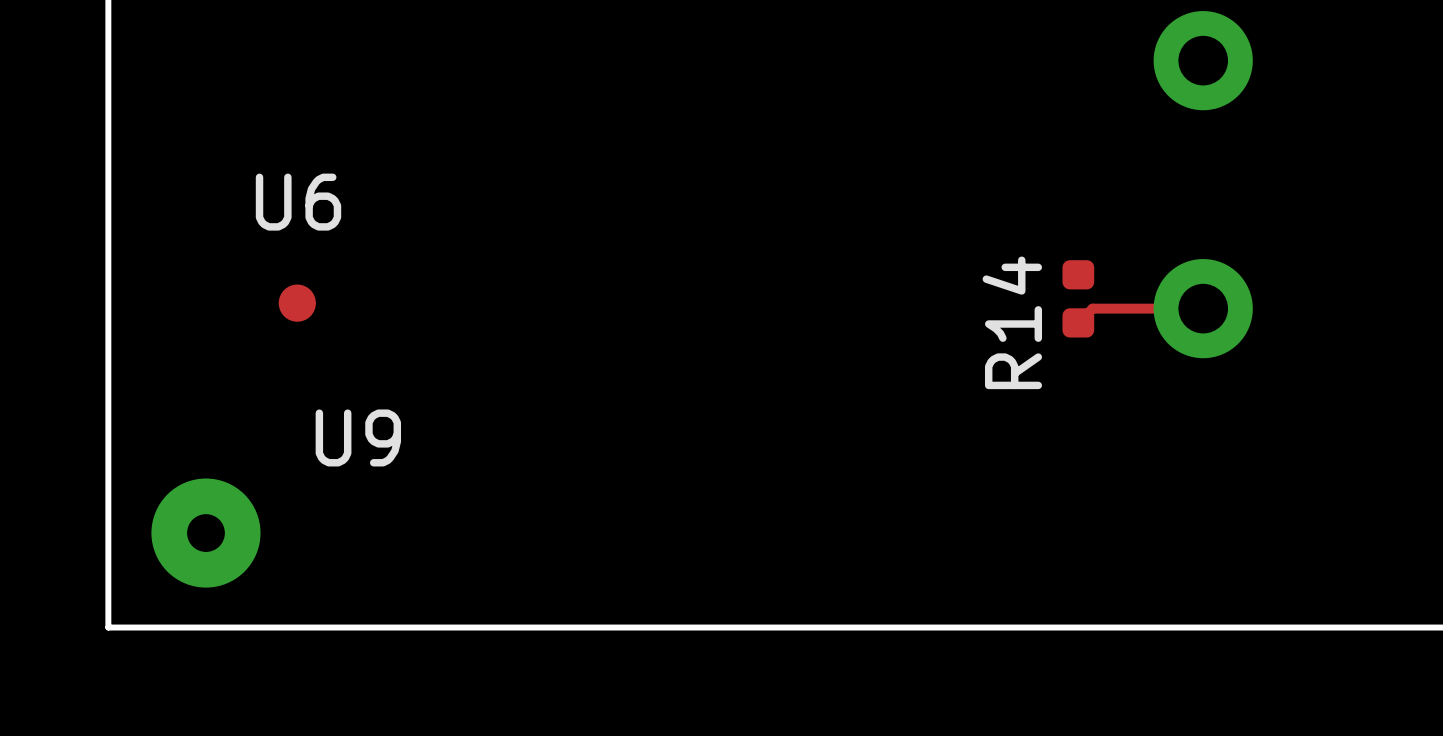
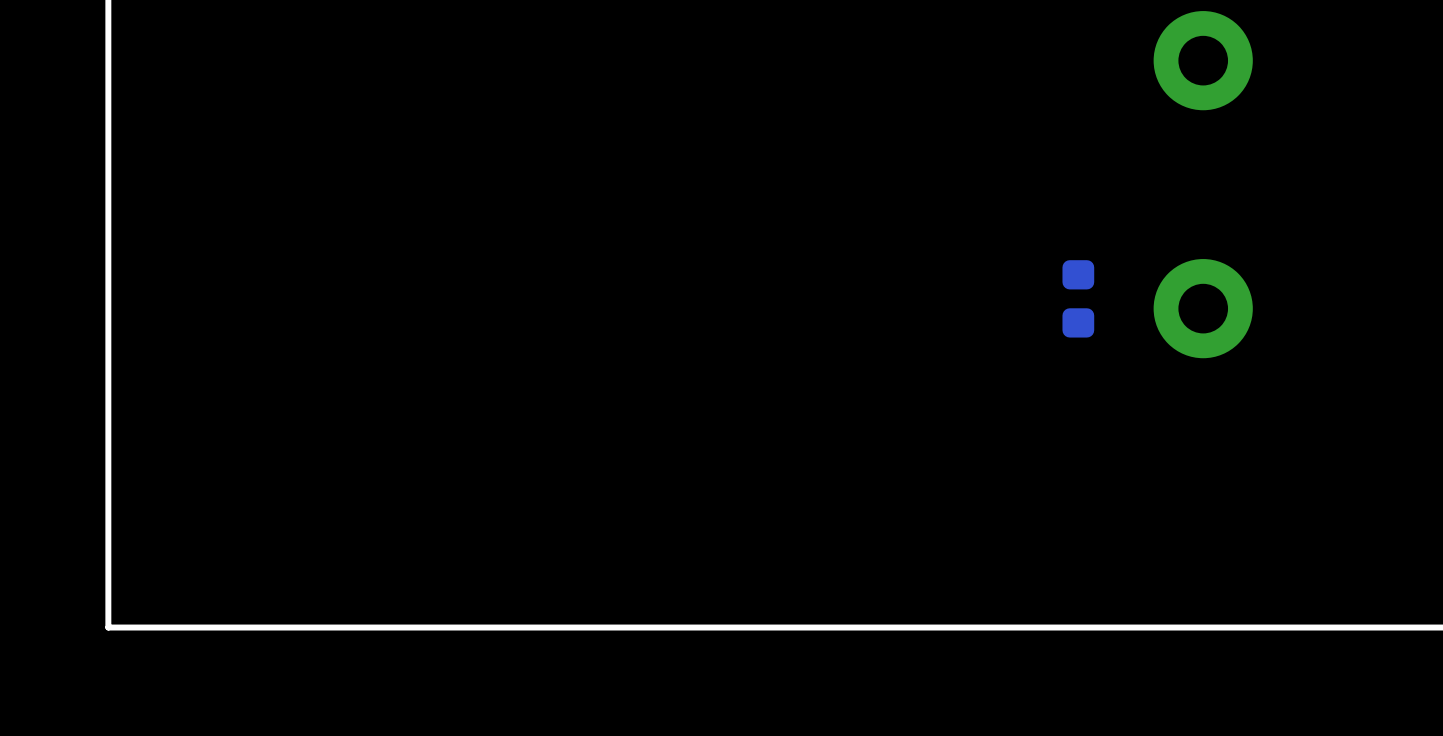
R14 side: top (1078, 298) -> bottom (1078, 298)
U6: (297, 303) -> none
top track: (1203, 308) (1092, 308) (1078, 322) -> none
U9: (205, 533) -> none

